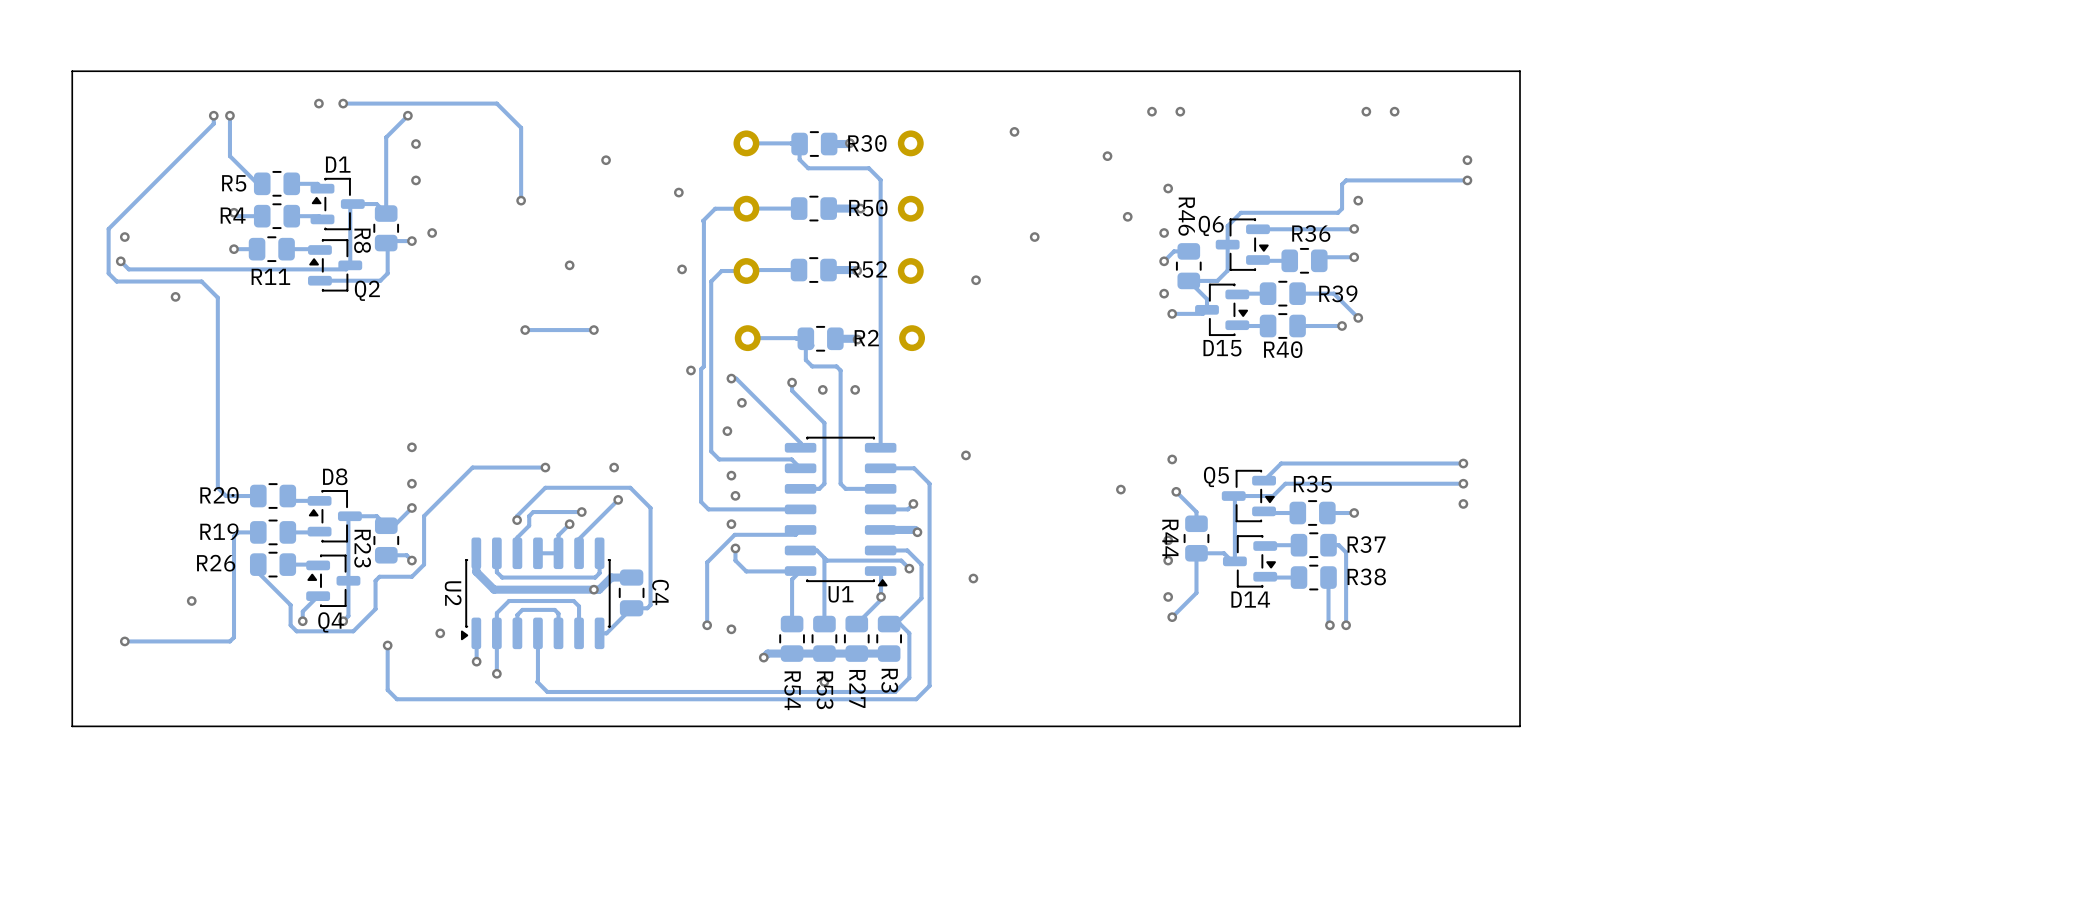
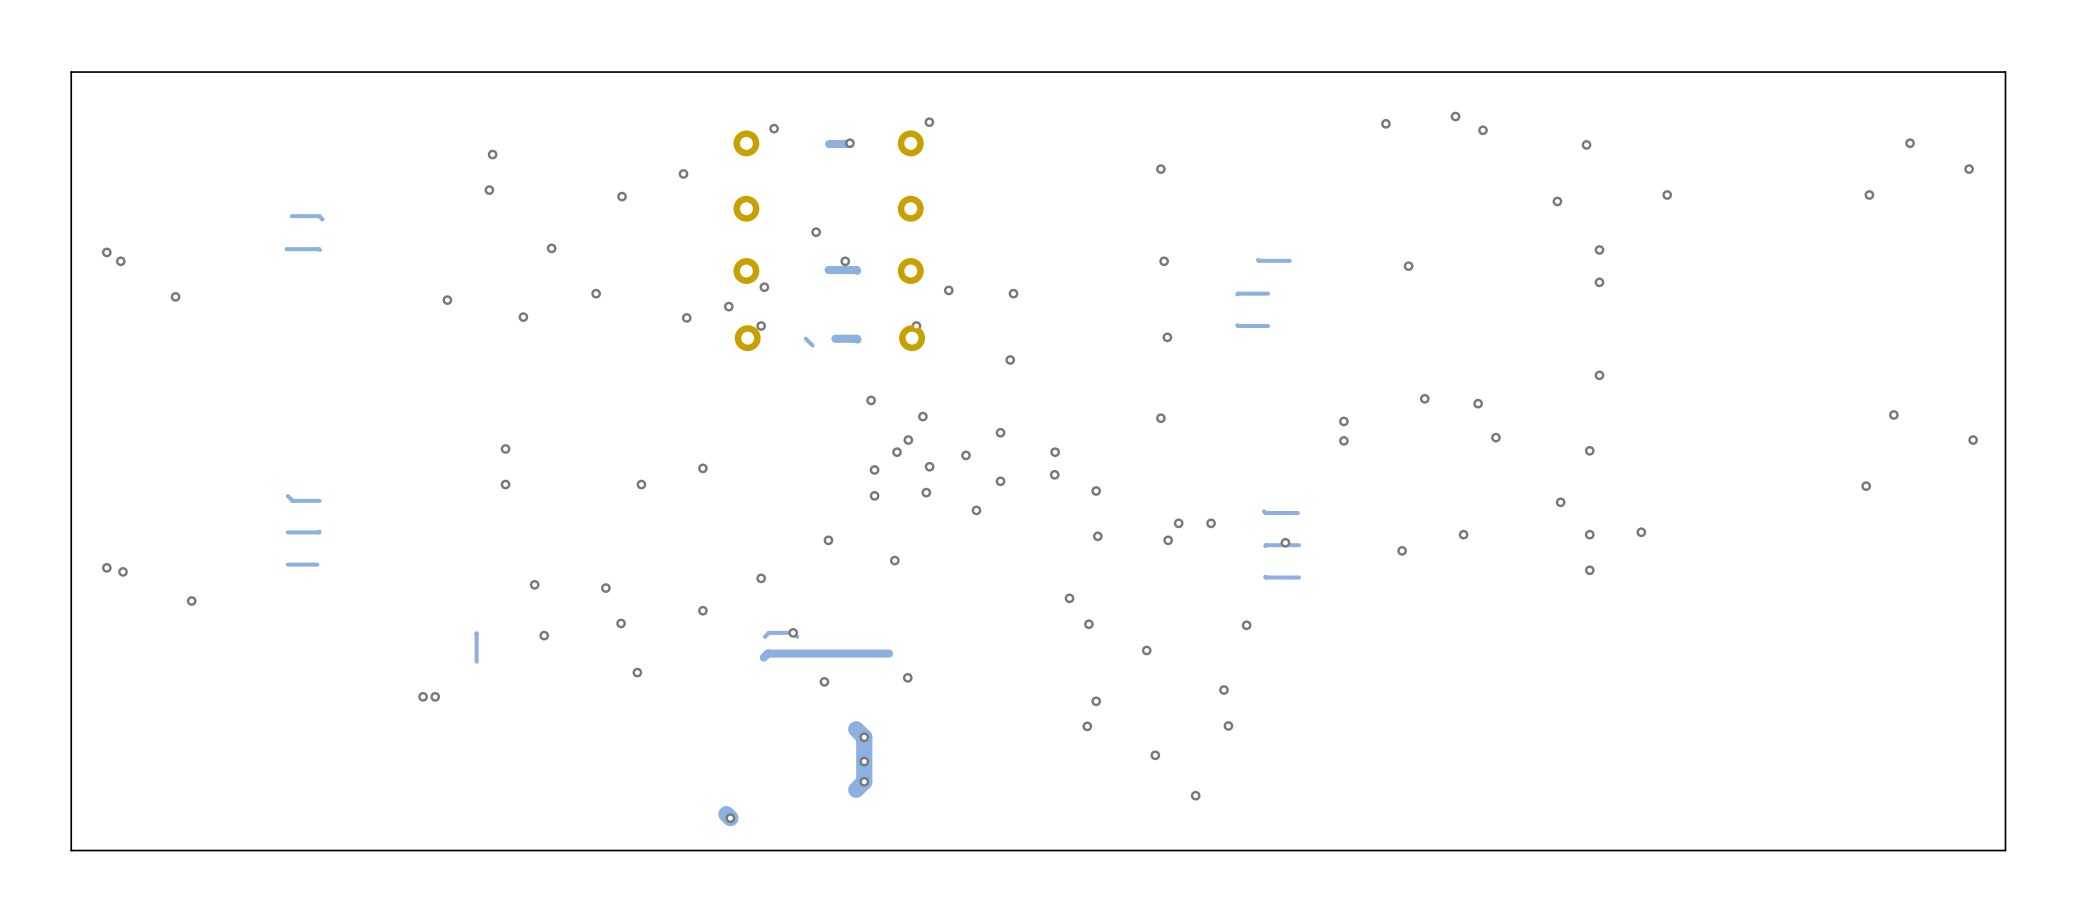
board edge: (1520, 71) (72, 71) (72, 726) (1520, 726) (1520, 71) -> (2005, 72) (2005, 850) (71, 850) (71, 72) (2005, 72)
via: (318, 103) -> none
track: (343, 103) (496, 103) (521, 127) (521, 200) -> none
via: (343, 103) -> none
via: (1152, 111) -> none
via: (1180, 111) -> none
via: (1366, 111) -> none
via: (1394, 111) -> none
track: (213, 115) (213, 123) (108, 228) (108, 273) (116, 281) (201, 281) (217, 297) (217, 487) (226, 496) (258, 496) -> none
via: (213, 115) -> none
track: (229, 115) (229, 156) (257, 183) (262, 183) -> none
via: (229, 115) -> none
track: (407, 115) (386, 137) (386, 213) (376, 204) (352, 204) (350, 206) (350, 265) (346, 269) (128, 269) (120, 261) -> none
via: (407, 115) -> none
via: none -> (1455, 116)
via: none -> (929, 122)
via: none -> (1385, 123)
via: none -> (774, 128)
via: none -> (1483, 130)
via: (1014, 131) -> none
track: (746, 143) (799, 144) -> none
via: none -> (1910, 143)
via: (415, 144) -> none
track: (799, 144) (799, 159) (808, 168) (868, 168) (880, 180) (880, 447) -> none
R30: (814, 144) -> none
via: none -> (1586, 144)
via: none -> (492, 154)
via: (1107, 156) -> none
via: (606, 160) -> none
via: (1467, 160) -> none
via: none -> (1969, 169)
via: (415, 180) -> none
track: (1467, 180) (1346, 180) (1342, 184) (1342, 208) (1338, 212) (1240, 212) (1227, 226) (1227, 270) (1217, 280) (1188, 280) (1206, 299) (1206, 309) (1202, 313) (1172, 313) -> none
via: (1467, 180) -> none
R5: (276, 183) -> none
track: (291, 183) (317, 183) (322, 188) -> none
via position: (1168, 188) -> (1160, 169)
via: none -> (489, 190)
via position: (678, 192) -> (683, 173)
via: none -> (1667, 194)
via: none -> (1869, 194)
via: none -> (622, 196)
via: (521, 200) -> none
via: (1358, 200) -> none
via: none -> (1557, 201)
D1: (337, 204) -> none
track: (746, 208) (715, 208) (703, 220) (703, 366) (701, 369) (701, 501) (708, 509) (800, 509) -> none
track: (799, 208) (746, 208) -> none
R50: (813, 208) -> none
track: (860, 208) (828, 208) -> none
via: (860, 208) -> none
track: (234, 212) (237, 216) (262, 216) -> none
via: (234, 212) -> none
R4: (276, 216) -> none
via: (1127, 216) -> none
R8: (386, 228) -> none
via: (1354, 228) -> none
track: (1354, 229) (1257, 229) -> none
via: (432, 232) -> none
via: none -> (816, 232)
via: (1164, 232) -> none
via position: (124, 237) -> (106, 252)
via: (1034, 237) -> none
track: (411, 241) (388, 241) (386, 243) (387, 273) (380, 280) (319, 280) -> none
via: (411, 241) -> none
Q6: (1242, 244) -> none
via: none -> (551, 248)
via: (234, 249) -> none
track: (257, 249) (234, 249) -> none
R11: (271, 249) -> none
via: none -> (1599, 249)
track: (1188, 251) (1174, 251) (1164, 261) -> none
track: (1354, 257) (1322, 257) (1319, 260) -> none
via: (1354, 257) -> none
R36: (1304, 260) -> none
Q2: (335, 265) -> none
via: (569, 265) -> none
R46: (1188, 266) -> none
via: none -> (1408, 266)
via: (682, 269) -> none
track: (798, 270) (721, 271) (711, 281) (711, 451) (719, 459) (791, 459) (800, 468) -> none
R52: (813, 270) -> none
via position: (857, 270) -> (845, 261)
via: (976, 280) -> none
via: none -> (1599, 282)
via: none -> (764, 287)
via: none -> (948, 290)
via: none -> (596, 293)
via: none -> (1013, 293)
via: (1164, 293) -> none
R39: (1282, 293) -> none
track: (1297, 293) (1333, 293) (1358, 317) -> none
via: none -> (447, 300)
via: none -> (728, 306)
D15: (1222, 309) -> none
via: (1172, 313) -> none
via: none -> (686, 317)
via: (1358, 317) -> none
via: none -> (761, 326)
via: none -> (916, 326)
R40: (1282, 326) -> none
track: (1342, 326) (1297, 326) -> none
via: (1342, 326) -> none
via position: (525, 330) -> (523, 317)
track: (593, 330) (525, 330) -> none
via: (593, 330) -> none
via: none -> (1167, 337)
track: (747, 338) (805, 338) (805, 359) (812, 366) (836, 366) (840, 370) (840, 483) (845, 488) (880, 488) -> none
R2: (820, 338) -> none
via: (857, 339) -> none
via: none -> (1010, 359)
via: (690, 370) -> none
via: none -> (1599, 375)
track: (731, 378) (736, 378) (800, 442) (800, 447) -> none
via: (731, 378) -> none
track: (792, 382) (792, 390) (824, 423) (824, 483) (819, 488) (800, 488) -> none
via: (792, 382) -> none
via: (822, 389) -> none
via position: (855, 389) -> (871, 400)
via: none -> (1424, 398)
via: (741, 402) -> none
via: none -> (1478, 403)
via: none -> (1893, 414)
via: none -> (922, 416)
via: none -> (1160, 418)
via: none -> (1343, 421)
via: (727, 431) -> none
via: none -> (1000, 432)
via: none -> (1495, 437)
via: none -> (908, 440)
via: none -> (1343, 440)
via: none -> (1973, 440)
via: (411, 447) -> none
via: none -> (505, 448)
via: none -> (1589, 450)
via: none -> (897, 452)
via: none -> (1055, 452)
via: (1172, 459) -> none
track: (1463, 463) (1281, 463) (1264, 480) -> none
via: (1463, 463) -> none
via: none -> (929, 466)
track: (545, 467) (472, 467) (424, 516) (424, 564) (411, 576) (379, 576) (375, 580) (375, 609) (353, 631) (296, 631) (290, 625) (290, 605) (258, 572) (258, 564) -> none
via: (545, 467) -> none
via: (614, 467) -> none
via: none -> (702, 468)
track: (880, 468) (914, 468) (929, 483) (929, 685) (916, 699) (396, 699) (387, 689) (387, 645) -> none
via: none -> (874, 469)
via: none -> (1054, 474)
via: (731, 475) -> none
via: none -> (1000, 481)
via: (411, 483) -> none
track: (1463, 483) (1285, 483) (1273, 496) (1233, 496) (1234, 561) (1232, 561) (1223, 553) (1196, 553) (1196, 592) (1172, 617) -> none
via: (1463, 483) -> none
via: none -> (505, 484)
via: none -> (641, 484)
via: none -> (1866, 486)
via position: (1120, 489) -> (1096, 491)
track: (1176, 491) (1196, 512) (1196, 523) -> none
via: (1176, 491) -> none
via: (735, 495) -> none
via: none -> (874, 495)
R20: (273, 496) -> none
Q5: (1248, 496) -> none
track: (618, 499) (579, 539) (579, 553) -> none
via: (618, 499) -> none
via: none -> (1560, 502)
track: (913, 503) (907, 509) (880, 509) -> none
via position: (913, 503) -> (926, 492)
via: (1463, 503) -> none
track: (411, 507) (394, 525) (386, 525) (376, 516) (348, 517) (348, 615) (343, 621) -> none
via: (411, 507) -> none
via: none -> (976, 510)
U1: (840, 511) -> none
track: (581, 512) (533, 512) (529, 516) (529, 525) (517, 537) (517, 553) -> none
via: (581, 512) -> none
R35: (1312, 513) -> none
track: (1354, 513) (1327, 513) -> none
via: (1354, 513) -> none
D8: (334, 516) -> none
track: (517, 520) (517, 516) (545, 487) (630, 487) (650, 507) (650, 605) (647, 608) (631, 608) (606, 633) (599, 633) -> none
via: (517, 520) -> none
via: none -> (1178, 523)
via: none -> (1211, 523)
track: (569, 524) (558, 535) (558, 553) (537, 553) -> none
via: (569, 524) -> none
via: (731, 524) -> none
track: (800, 529) (795, 534) (734, 534) (707, 562) (707, 625) -> none
track: (880, 529) (915, 529) (917, 532) -> none
track: (258, 532) (237, 532) (234, 536) (234, 637) (229, 641) (124, 641) -> none
R19: (273, 532) -> none
via: (917, 532) -> none
via: none -> (1641, 532)
via: none -> (1463, 534)
via: none -> (1589, 534)
via: none -> (1097, 536)
R44: (1196, 538) -> none
R23: (386, 540) -> none
via: none -> (828, 540)
via: none -> (1285, 542)
R37: (1313, 545) -> none
track: (1328, 545) (1338, 545) (1346, 552) (1346, 625) -> none
track: (735, 548) (735, 560) (746, 571) (800, 571) -> none
via: (735, 548) -> none
track: (800, 550) (816, 550) (827, 560) (901, 560) (909, 568) -> none
track: (880, 550) (907, 550) (921, 564) (921, 598) (895, 624) -> none
via: none -> (1402, 550)
track: (476, 553) (476, 571) (494, 589) (599, 589) (611, 577) (631, 577) -> none
track: (599, 553) (599, 573) (595, 577) (502, 577) (496, 572) (496, 553) -> none
track: (386, 555) (406, 555) (411, 560) -> none
track: (824, 557) (824, 624) -> none
via: (411, 560) -> none
via: (1168, 560) -> none
D14: (1250, 561) -> none
R26: (273, 564) -> none
via: none -> (106, 567)
via position: (909, 568) -> (894, 560)
via: none -> (1589, 570)
via: none -> (123, 571)
track: (800, 571) (792, 579) (792, 624) -> none
track: (880, 571) (881, 599) (856, 624) -> none
R38: (1313, 577) -> none
track: (1328, 577) (1329, 625) -> none
via: none -> (761, 578)
via: (973, 578) -> none
Q4: (333, 580) -> none
via: none -> (534, 584)
via position: (593, 589) -> (605, 588)
C4: (631, 592) -> none
U2: (535, 593) -> none
track: (318, 596) (302, 611) (302, 621) -> none
via: (881, 596) -> none
via: (1168, 596) -> none
via: none -> (1069, 598)
via: (1172, 617) -> none
via: (302, 621) -> none
via: (343, 621) -> none
via: none -> (621, 623)
track: (889, 624) (900, 624) (909, 633) (909, 677) (895, 691) (547, 691) (537, 681) (537, 633) -> none
via: none -> (1088, 624)
via position: (707, 625) -> (702, 610)
via: none -> (1246, 625)
via: (1329, 625) -> none
via: (1346, 625) -> none
via: (731, 629) -> none
via: none -> (793, 632)
via: (440, 633) -> none
track: (558, 633) (558, 613) (554, 609) (522, 609) (517, 614) (517, 633) -> none
track: (579, 633) (579, 606) (573, 601) (509, 601) (496, 613) (496, 673) -> none
via: none -> (544, 635)
track: none -> (797, 636) (793, 632) (768, 632) (764, 636)
R54: (792, 638) -> none
R53: (824, 638) -> none
R27: (856, 638) -> none
R3: (889, 638) -> none
via: (124, 641) -> none
via: (387, 645) -> none
via: none -> (1146, 650)
via: (763, 657) -> none
via: (476, 661) -> none
via: none -> (637, 672)
via: (496, 673) -> none
via: none -> (907, 677)
via: none -> (1223, 689)
via: none -> (423, 696)
via: none -> (435, 696)
via: none -> (1096, 701)
via: none -> (1228, 725)
via: none -> (1087, 726)
track: none -> (856, 729) (864, 737) (864, 781) (856, 789)
via: none -> (864, 737)
via: none -> (1155, 755)
via: none -> (864, 761)
via: none -> (864, 781)
via: none -> (1195, 795)
track: none -> (726, 814) (730, 818)
via: none -> (730, 818)

